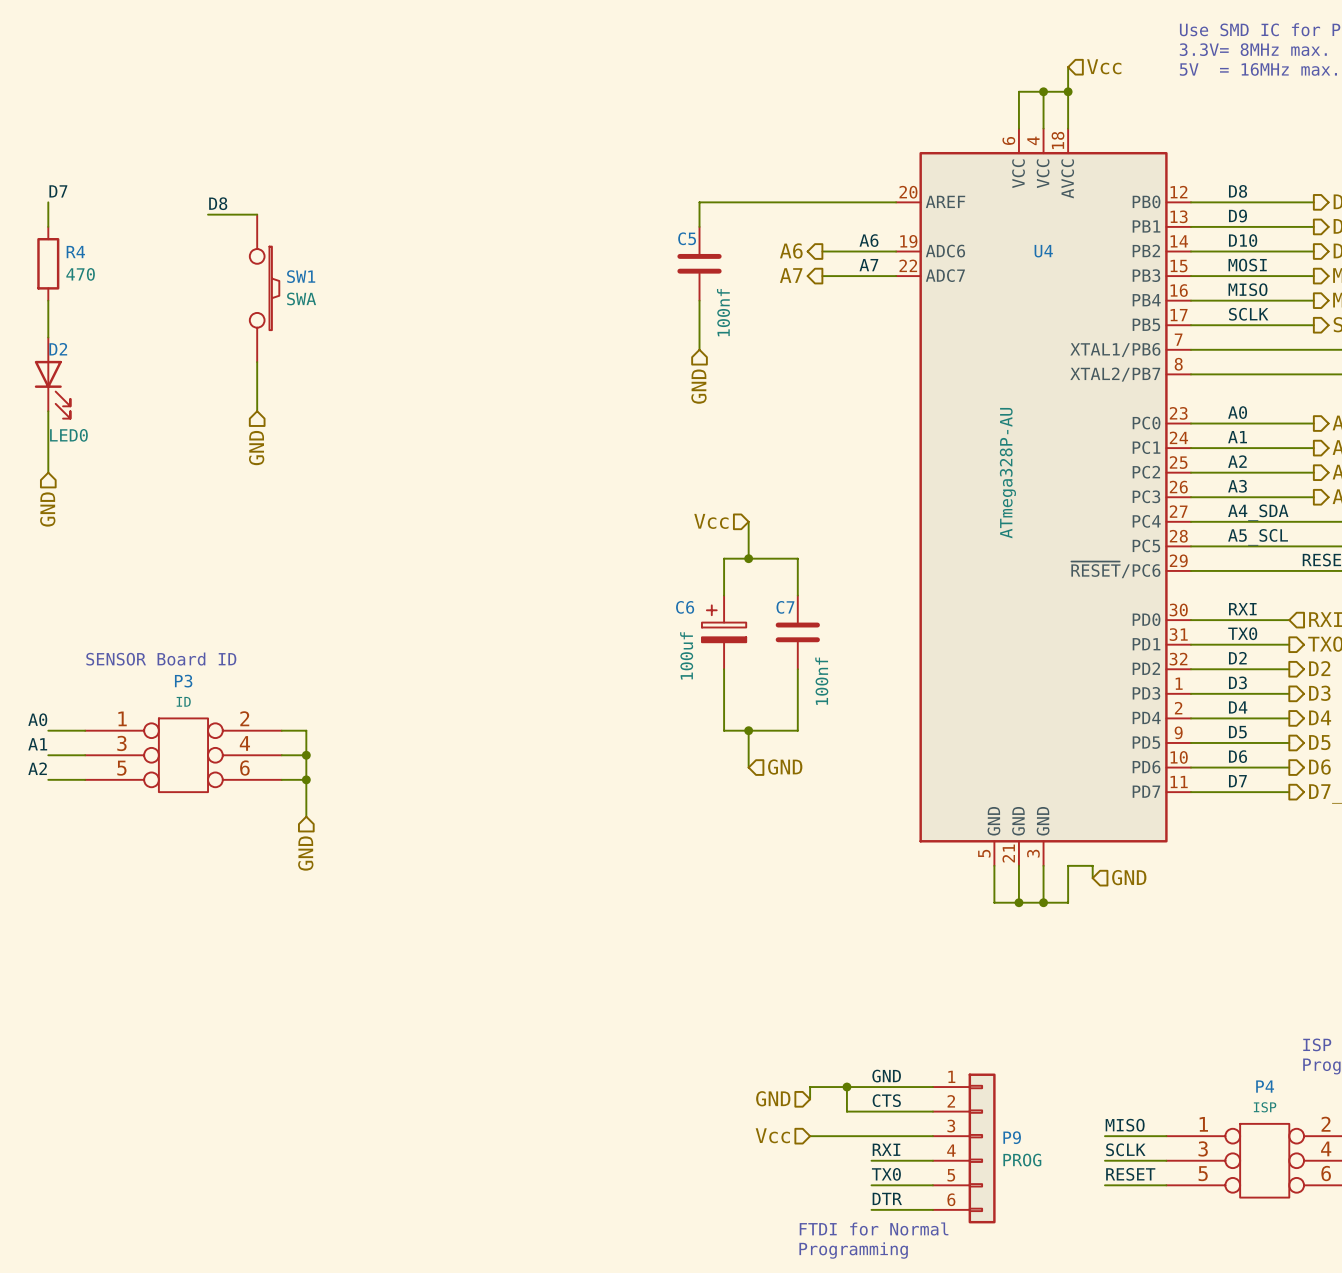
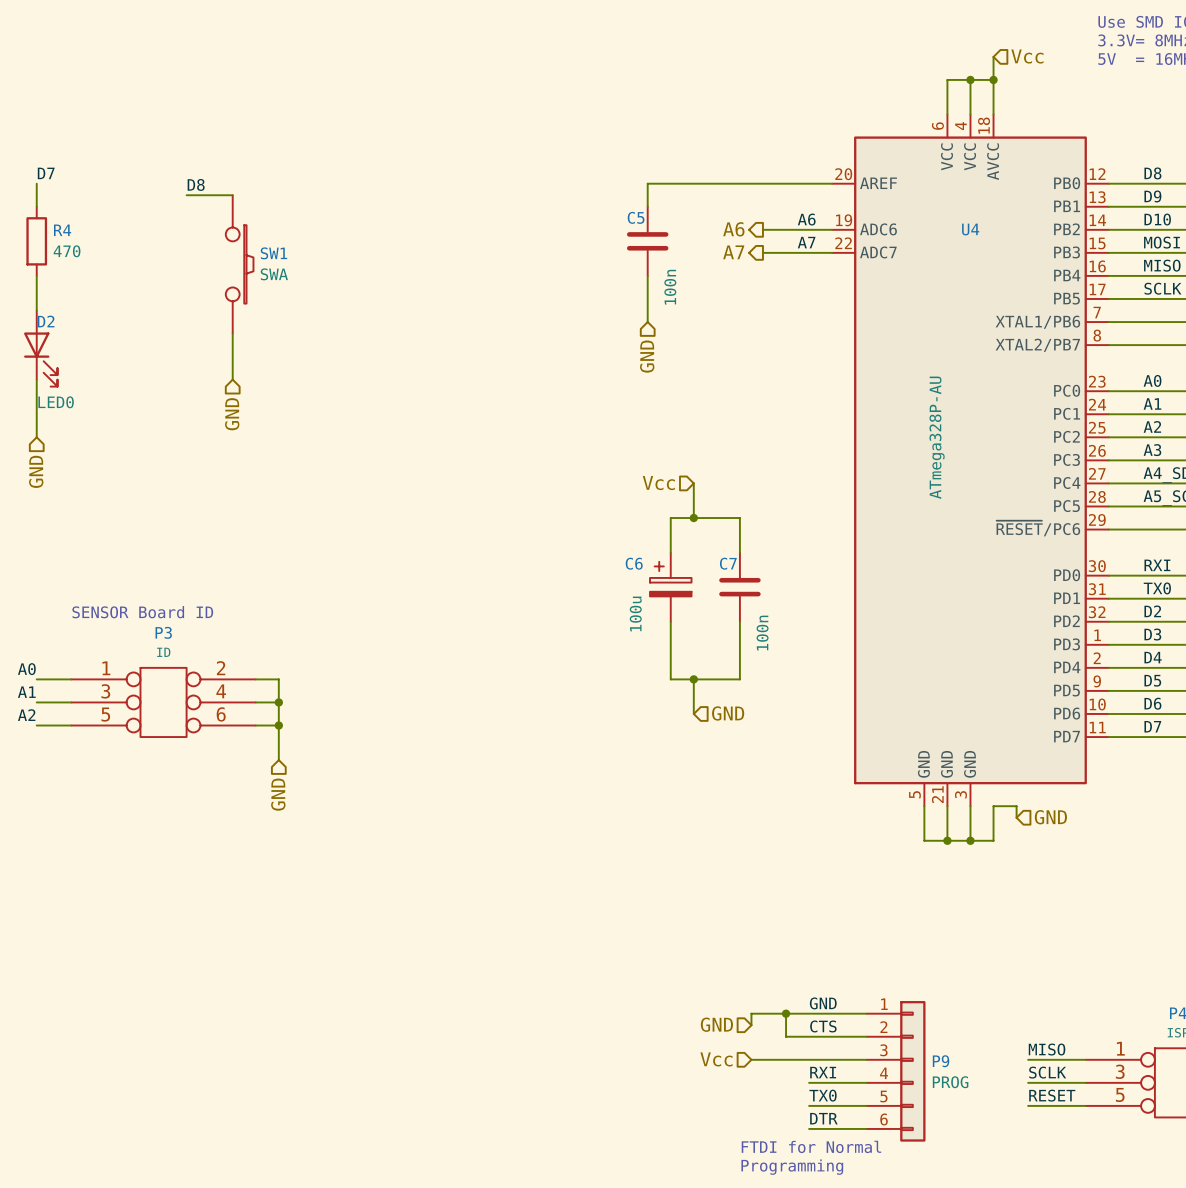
C5 value: 100nf (723, 312) -> 100n (670, 287)
C6 value: 100uf (686, 655) -> 100u (635, 614)
C7 value: 100nf (821, 681) -> 100n (762, 633)

